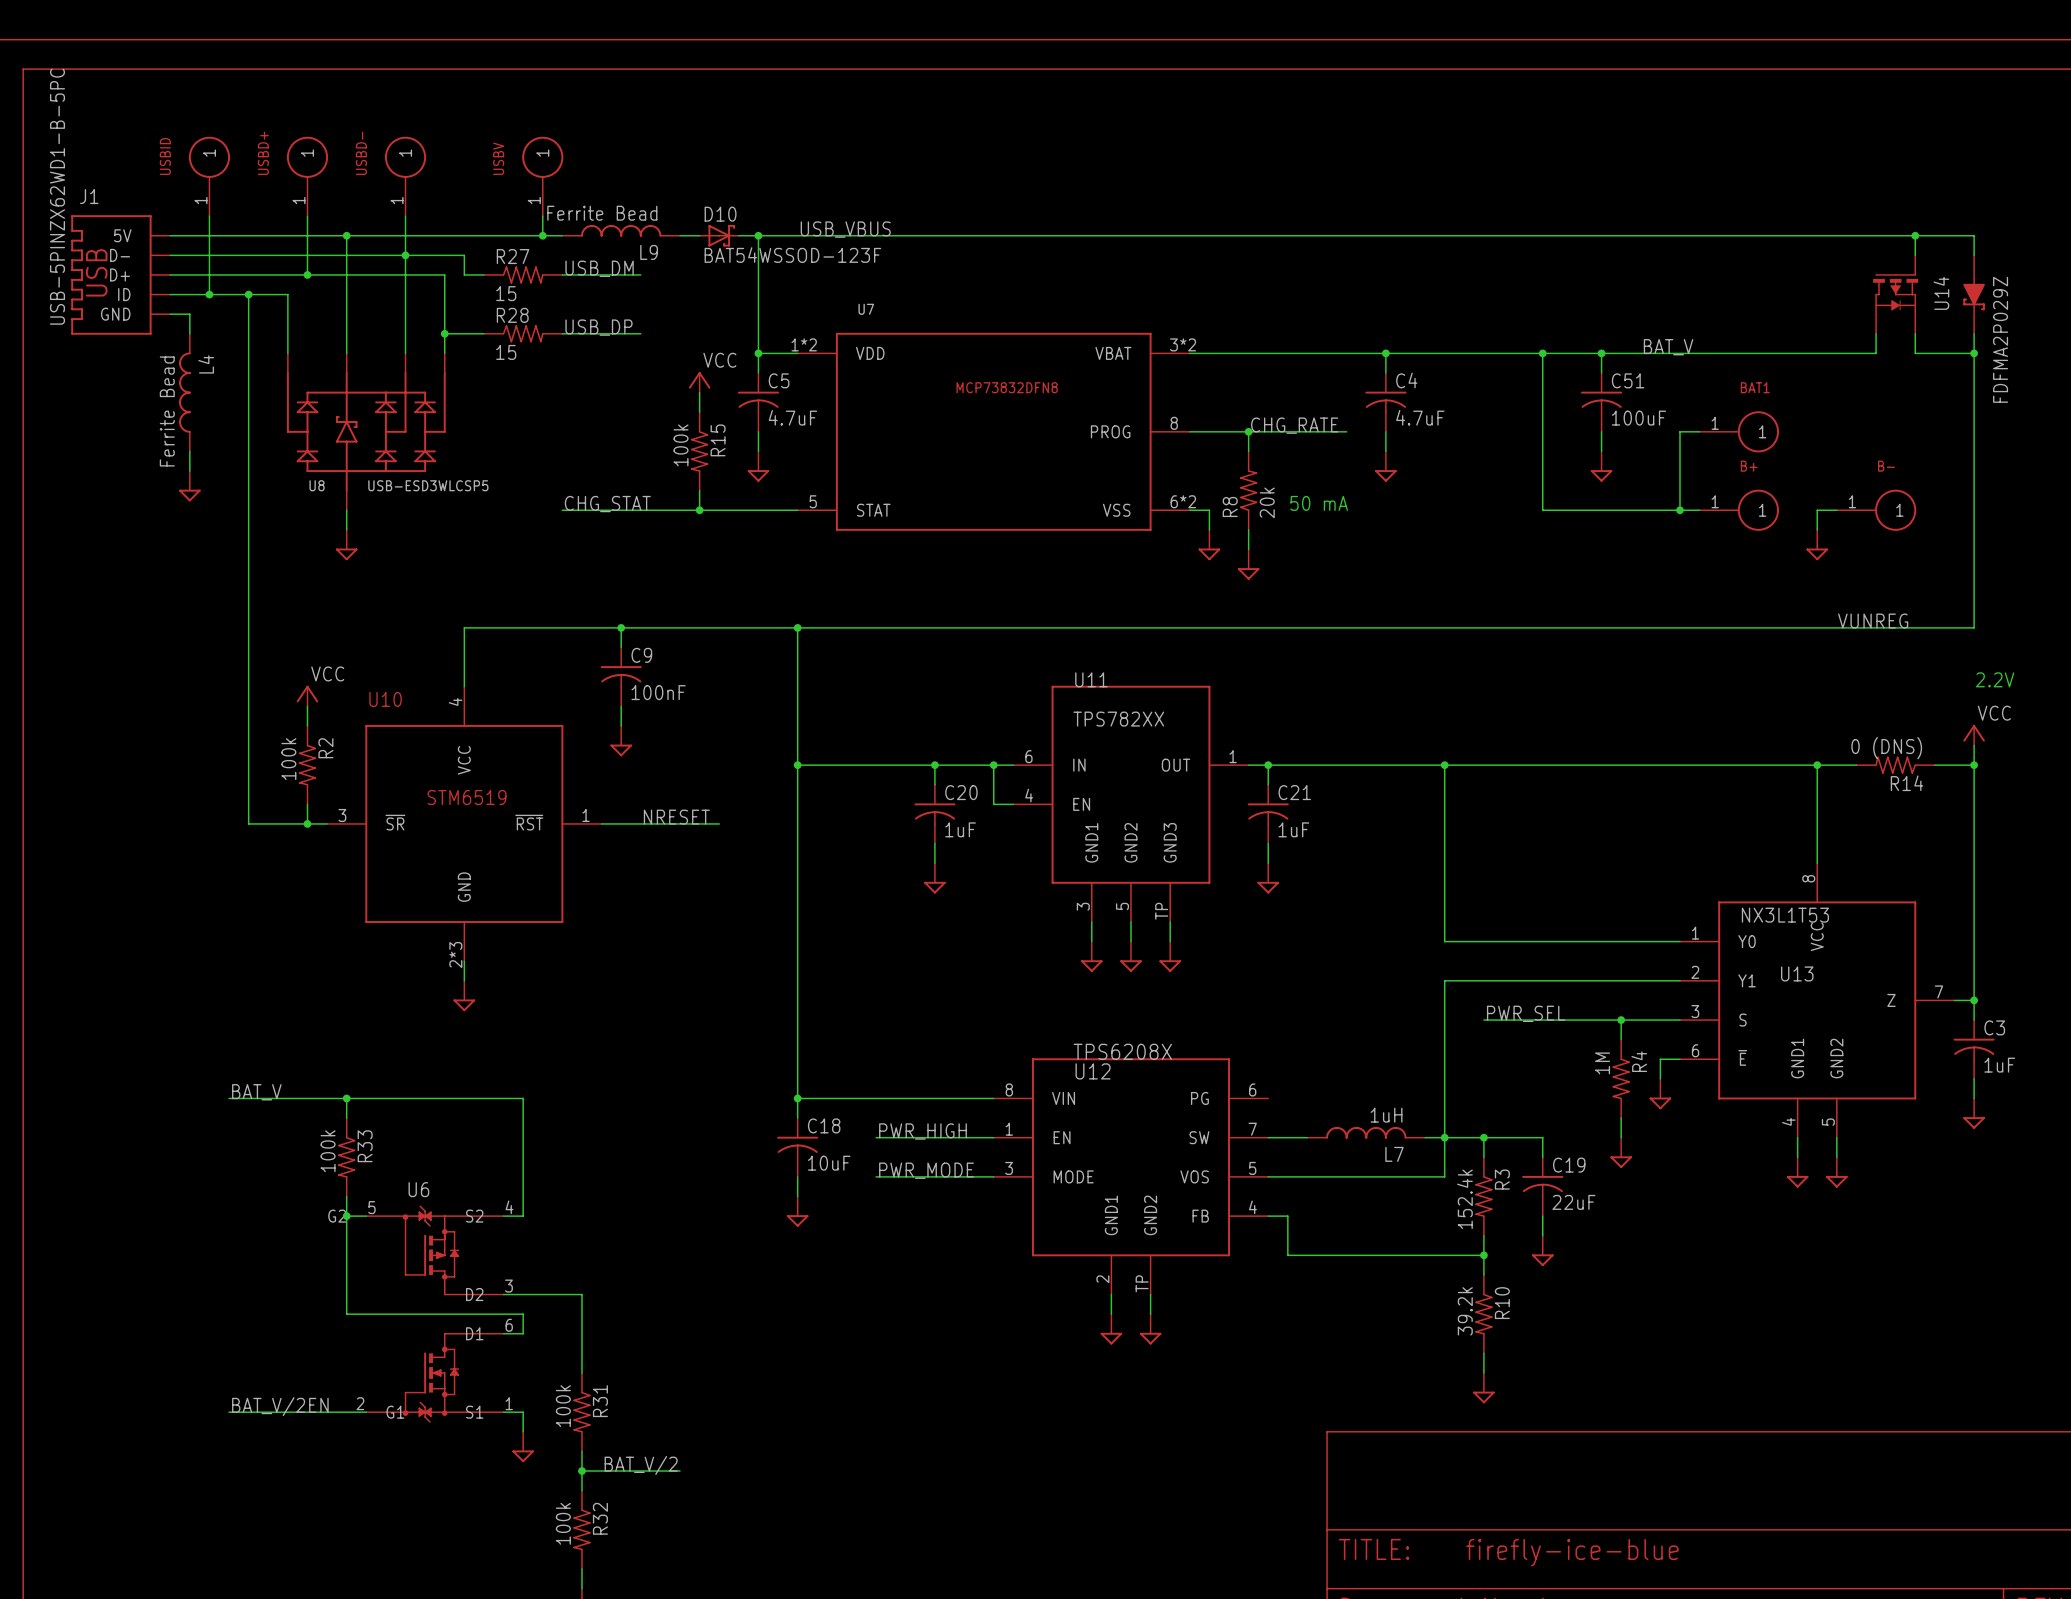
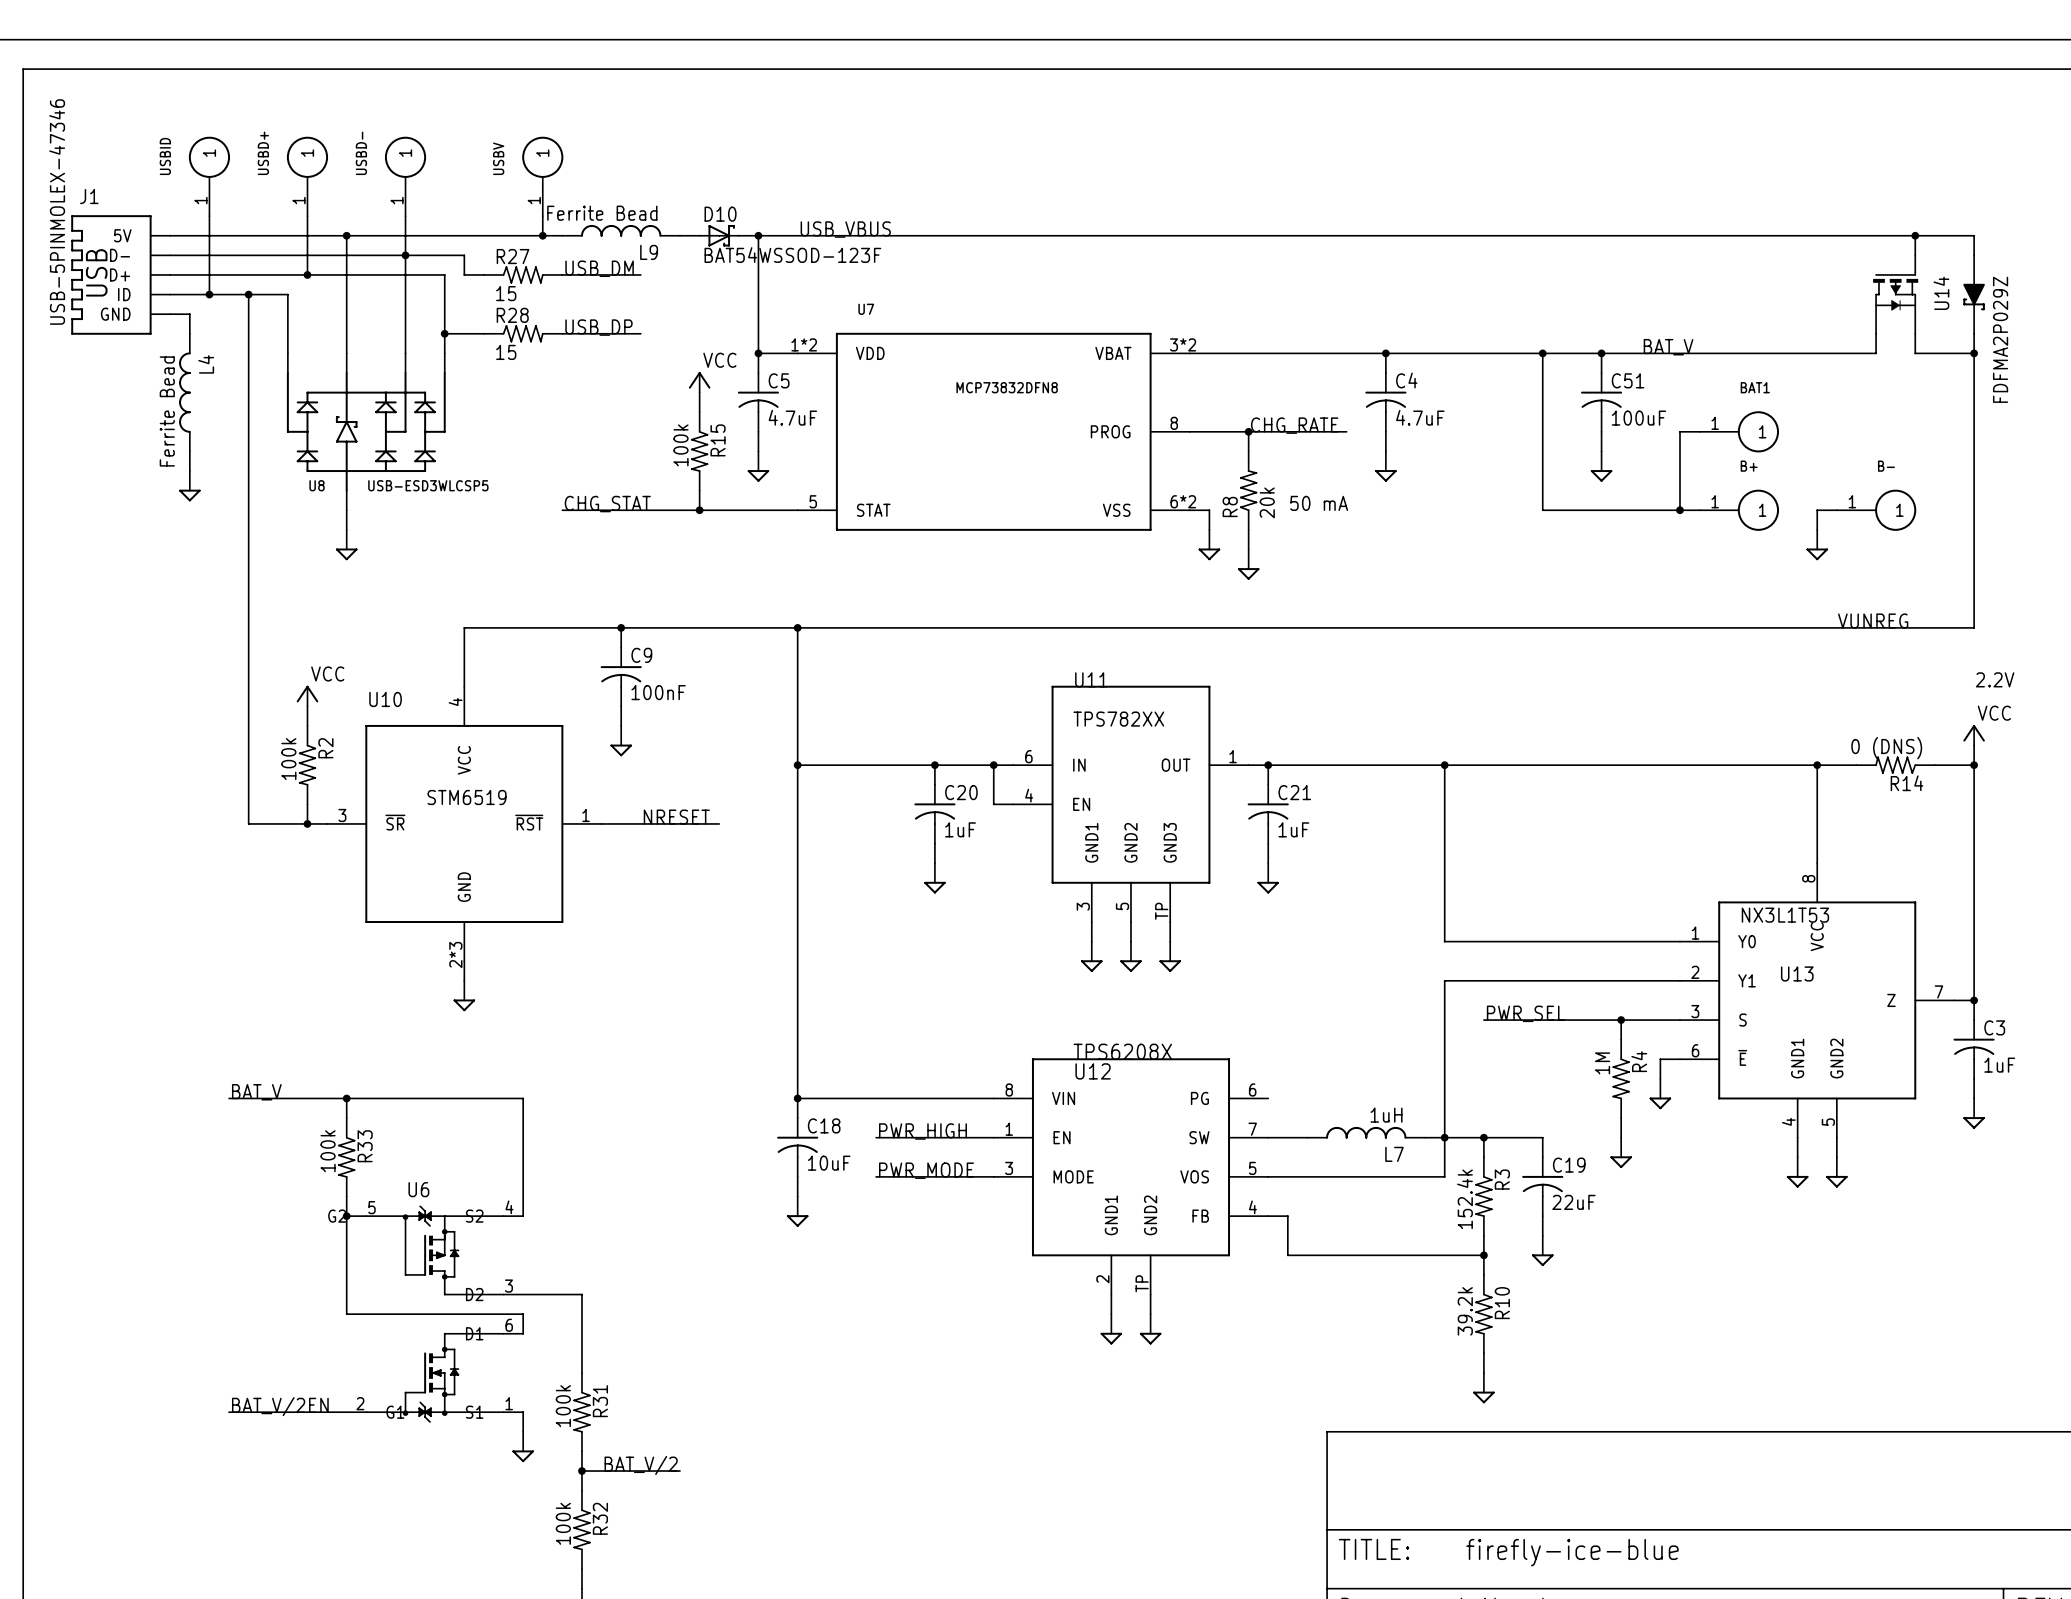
J1 value: USB-5PINZX62WD1-B-5PC (57, 196) -> USB-5PINMOLEX-47346 (57, 212)

